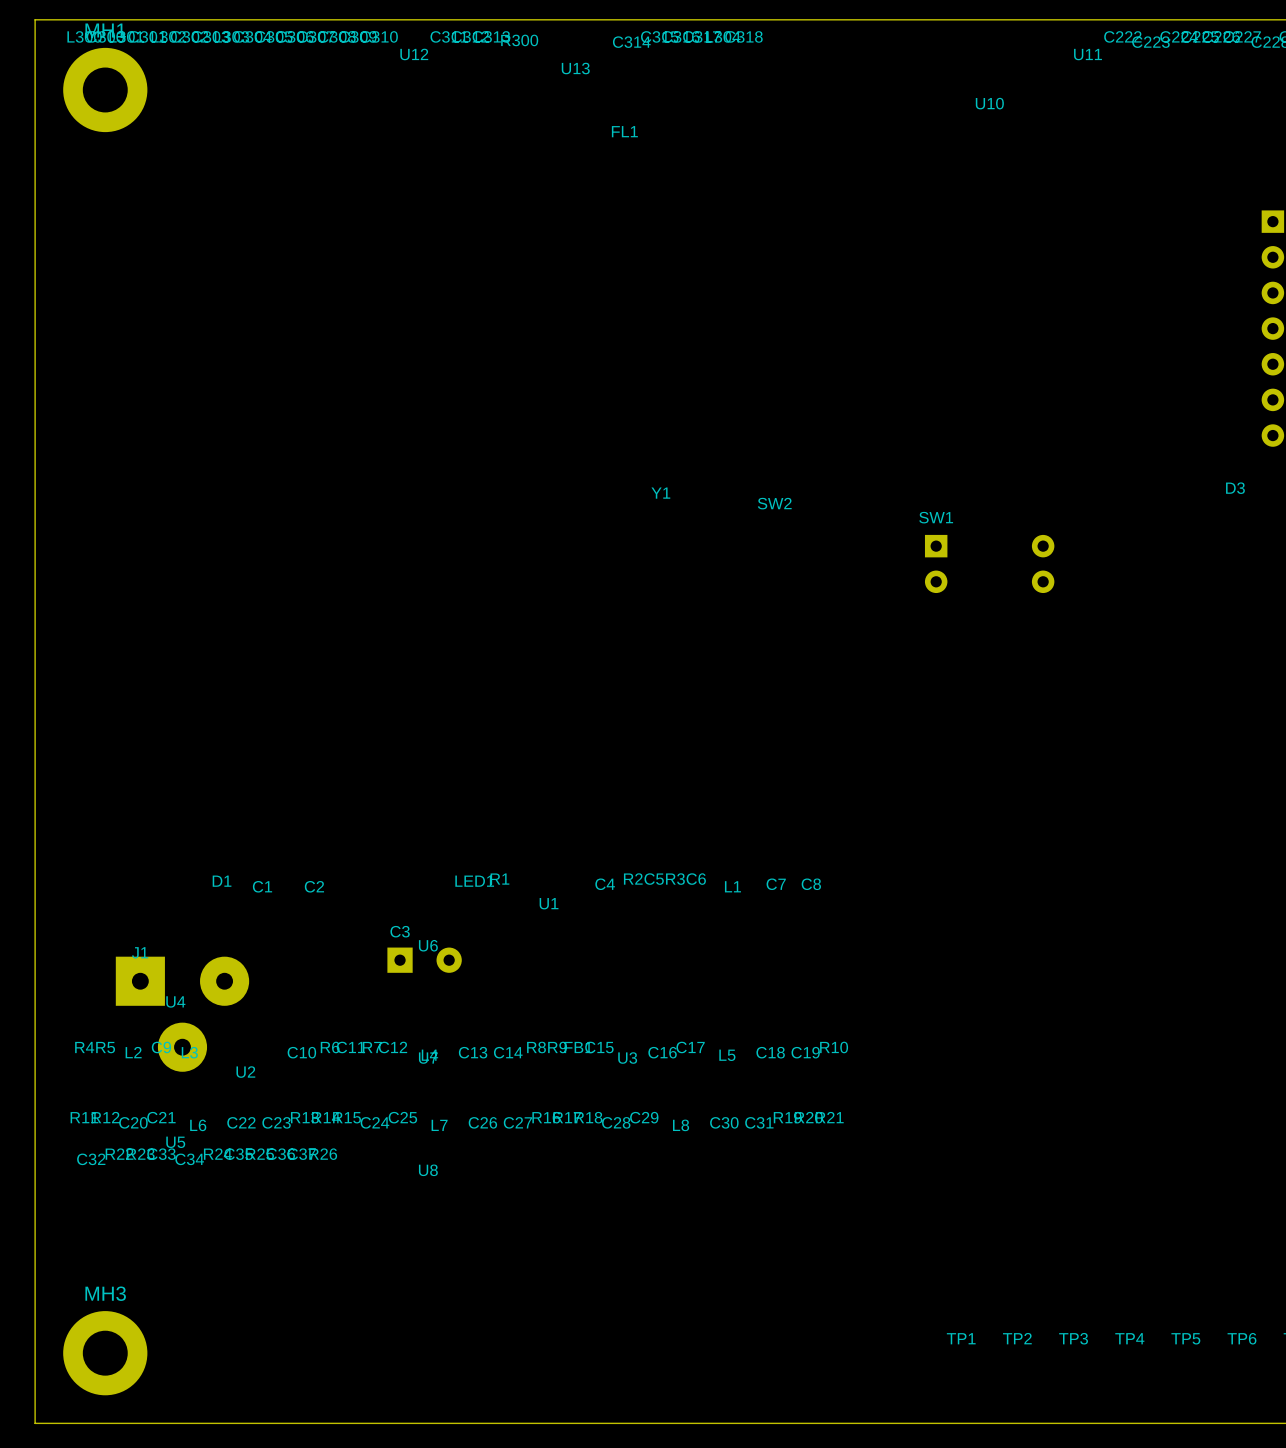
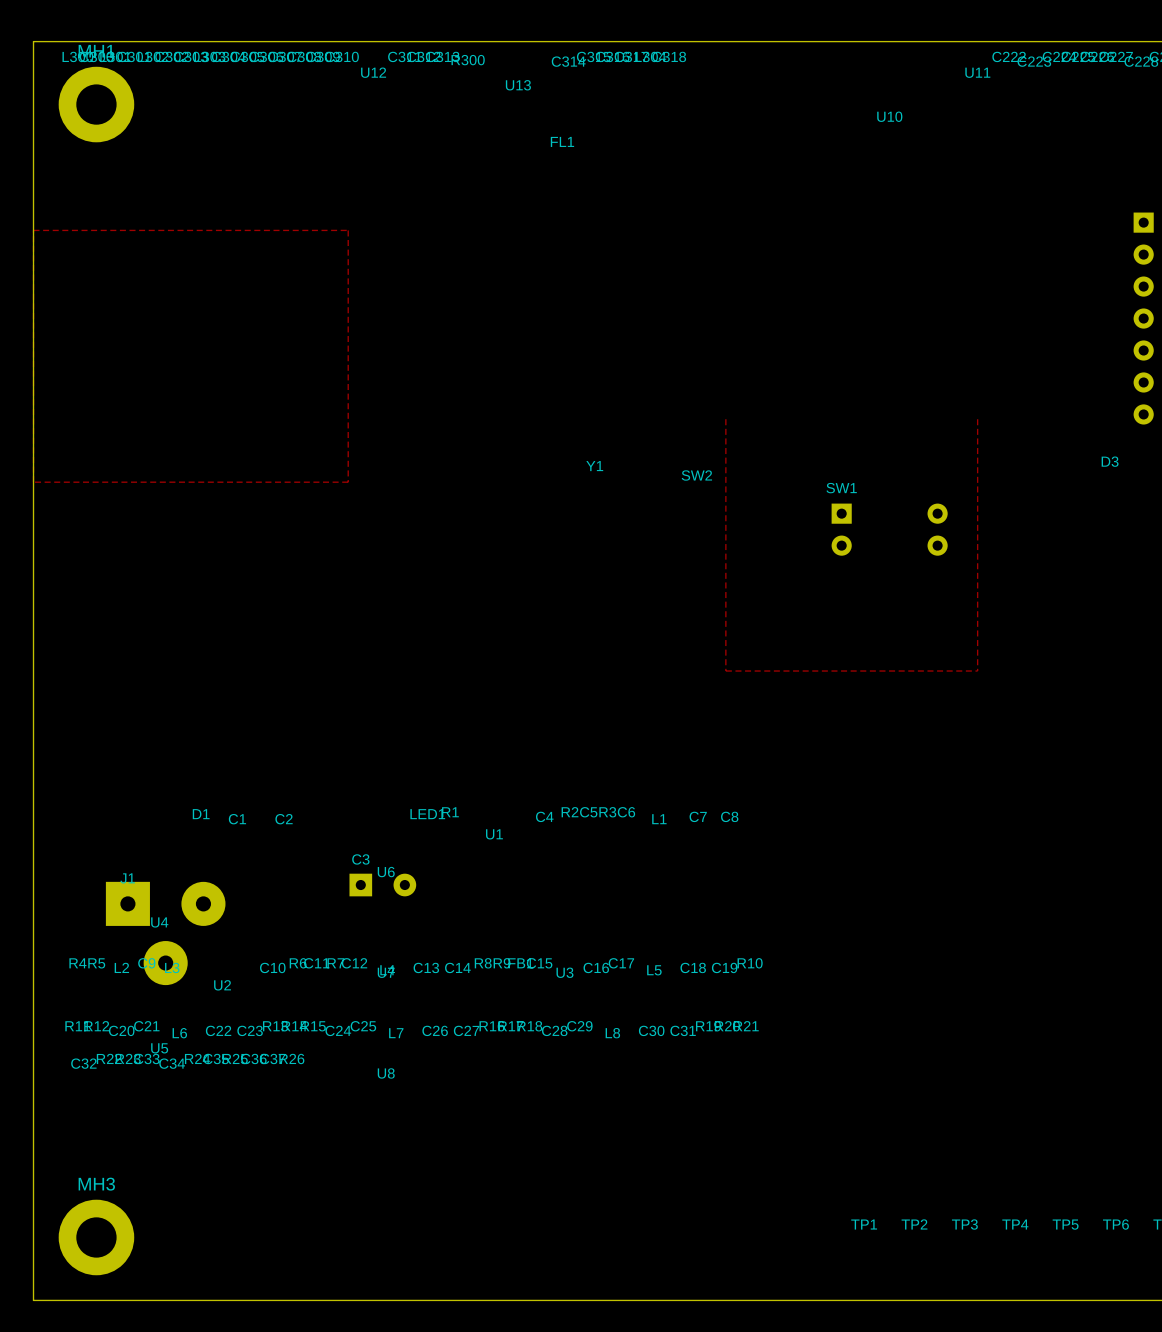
zone outline: none -> (33, 230) (348, 230) (348, 482) (33, 482) (33, 230)
zone outline: none -> (725, 419) (725, 671) (977, 671) (977, 419)

